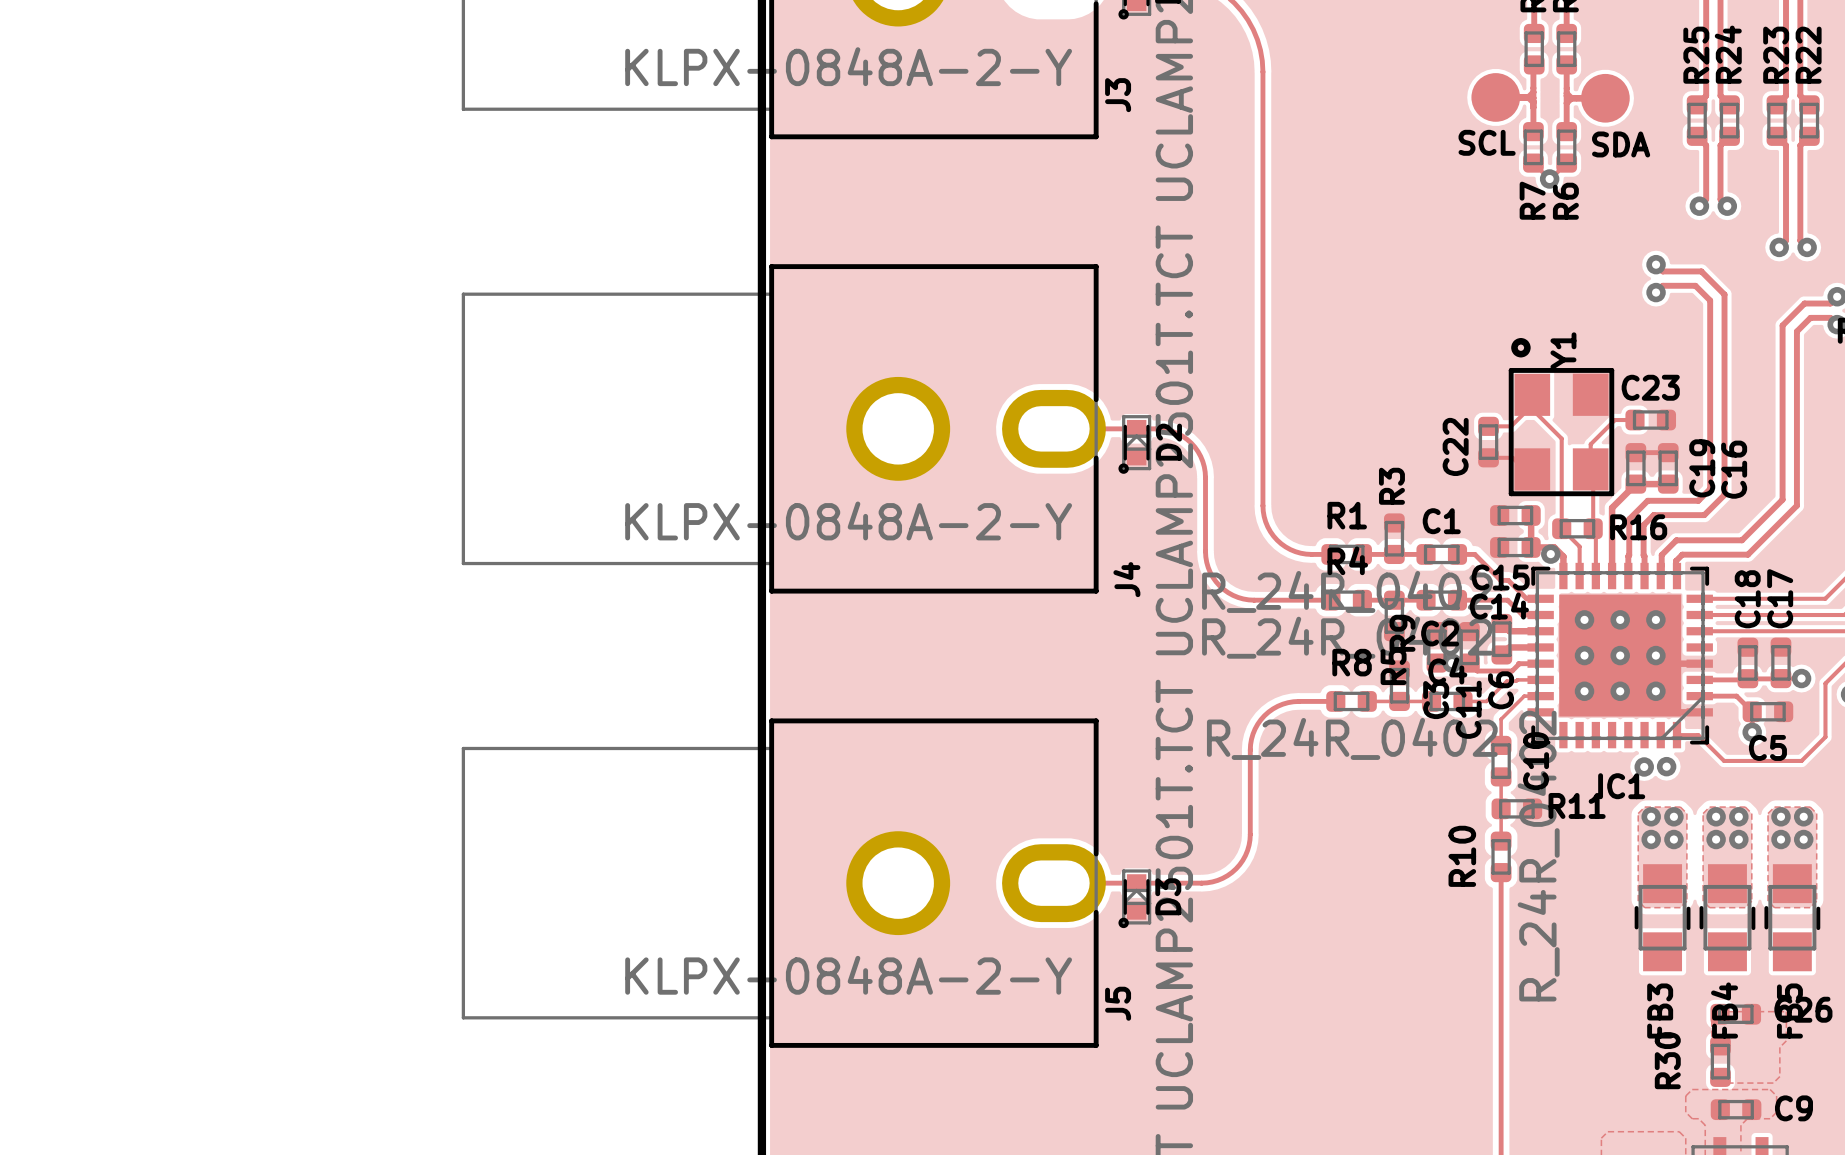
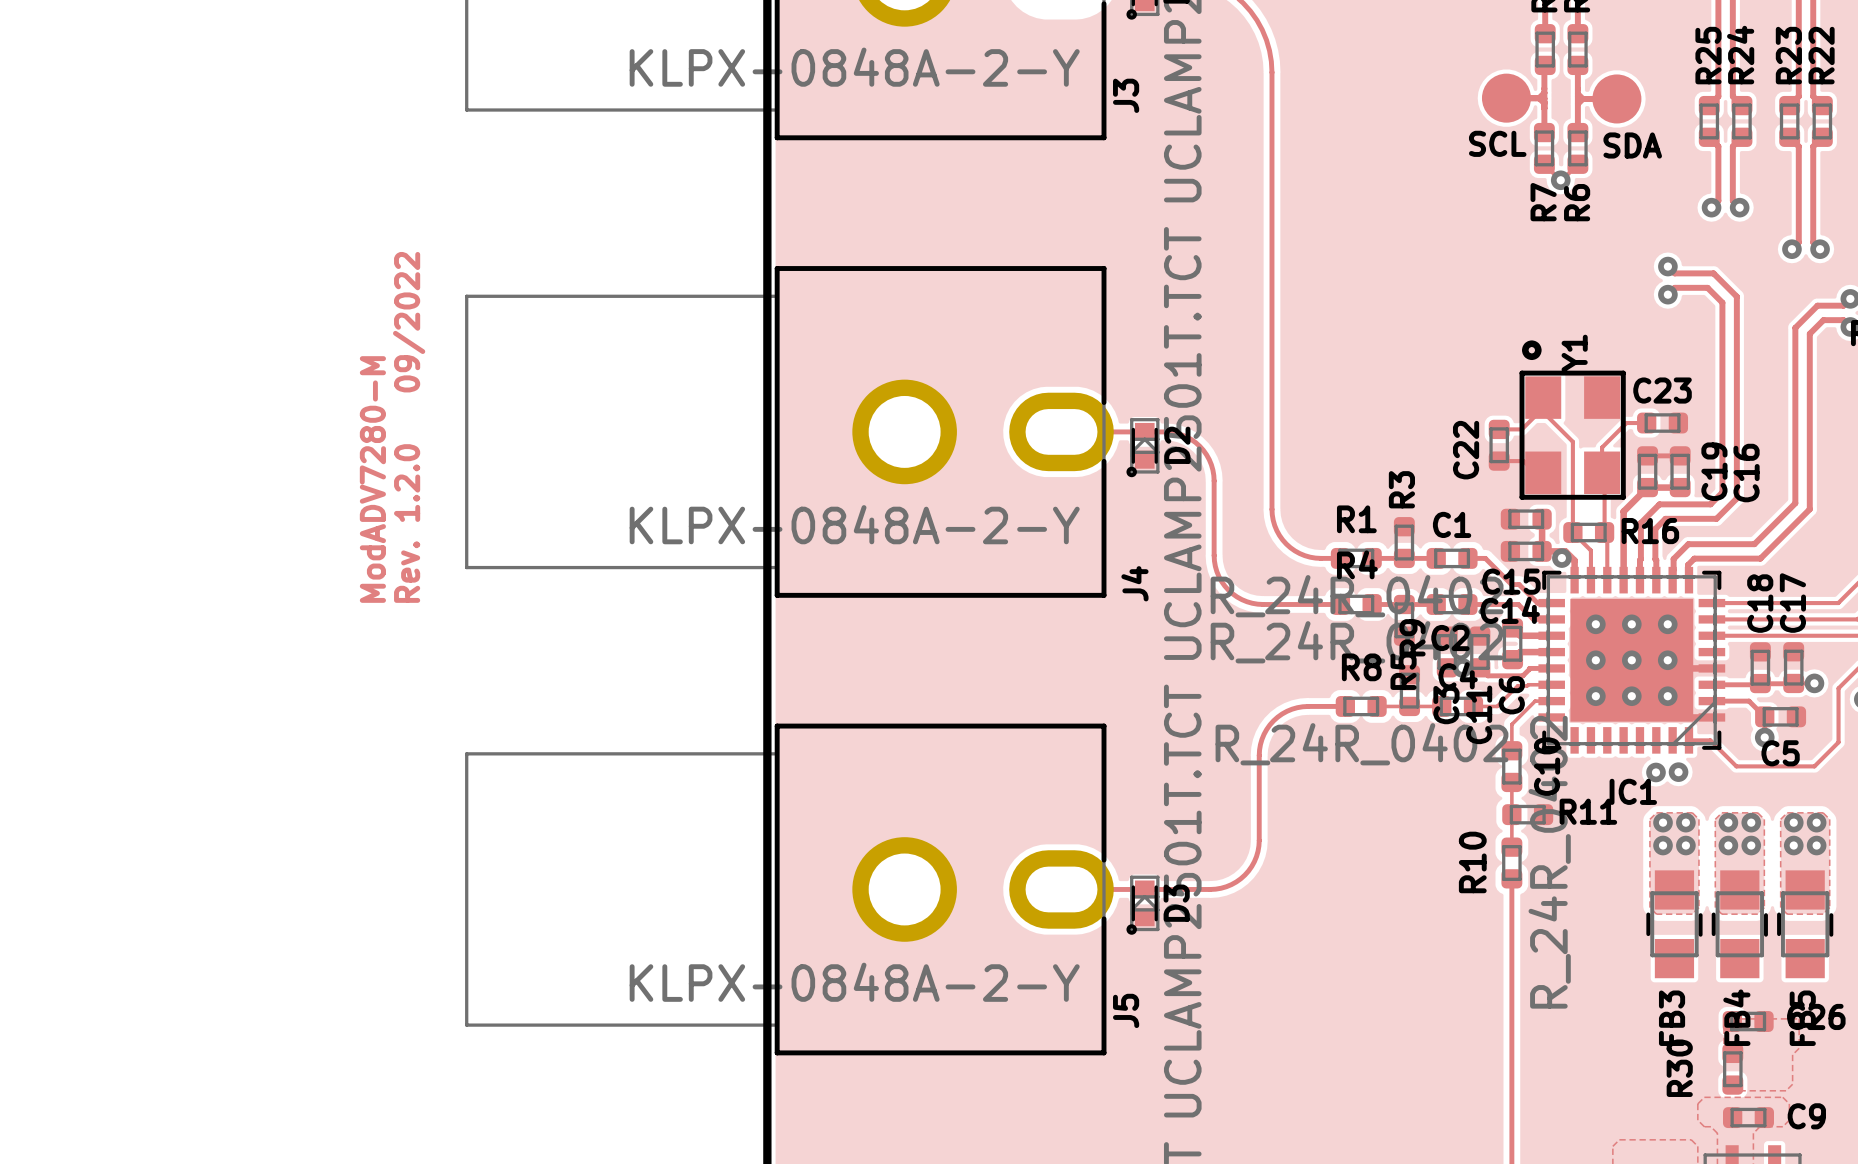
text: none -> Rev. 1.2.0 09/2022 (409, 427)
text: none -> ModADV7280-M (372, 479)

